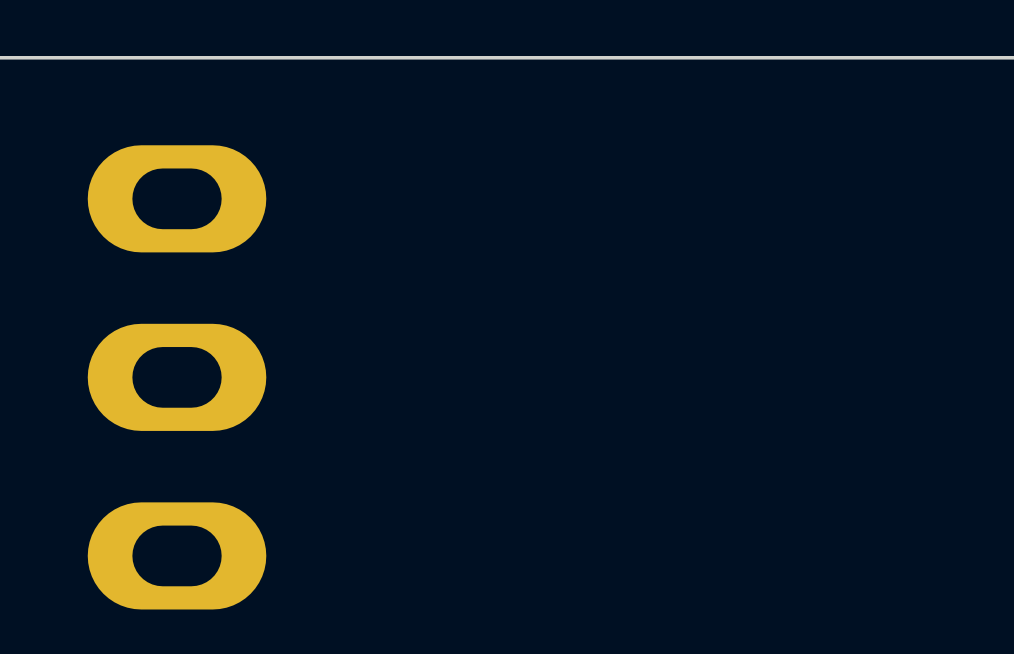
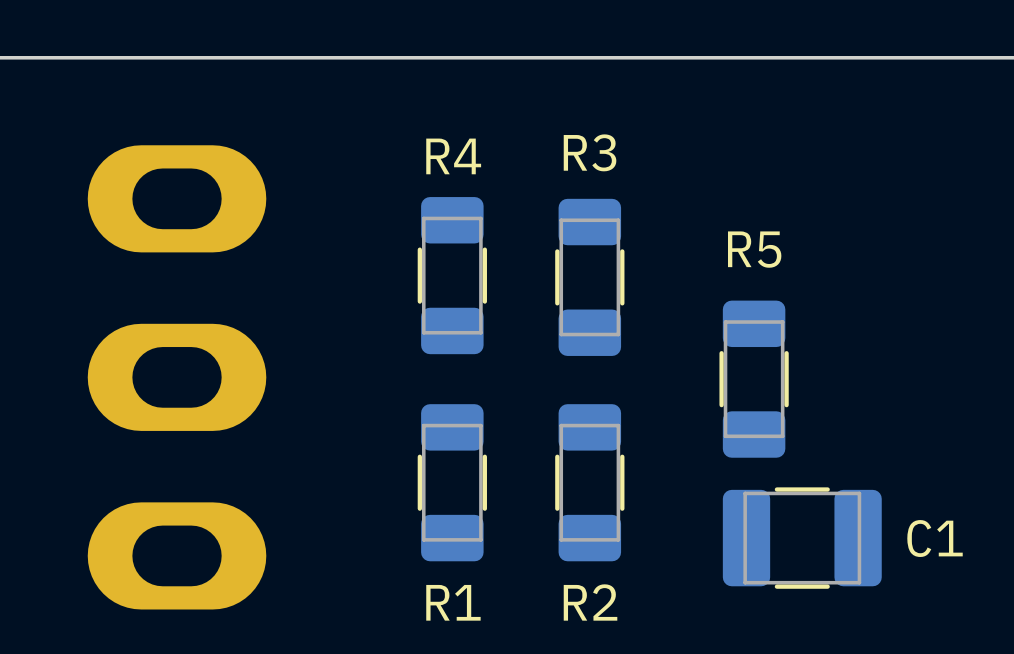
R4: none -> (452, 275)
R3: none -> (589, 277)
R5: none -> (754, 379)
R1: none -> (452, 482)
R2: none -> (589, 482)
C1: none -> (802, 538)

